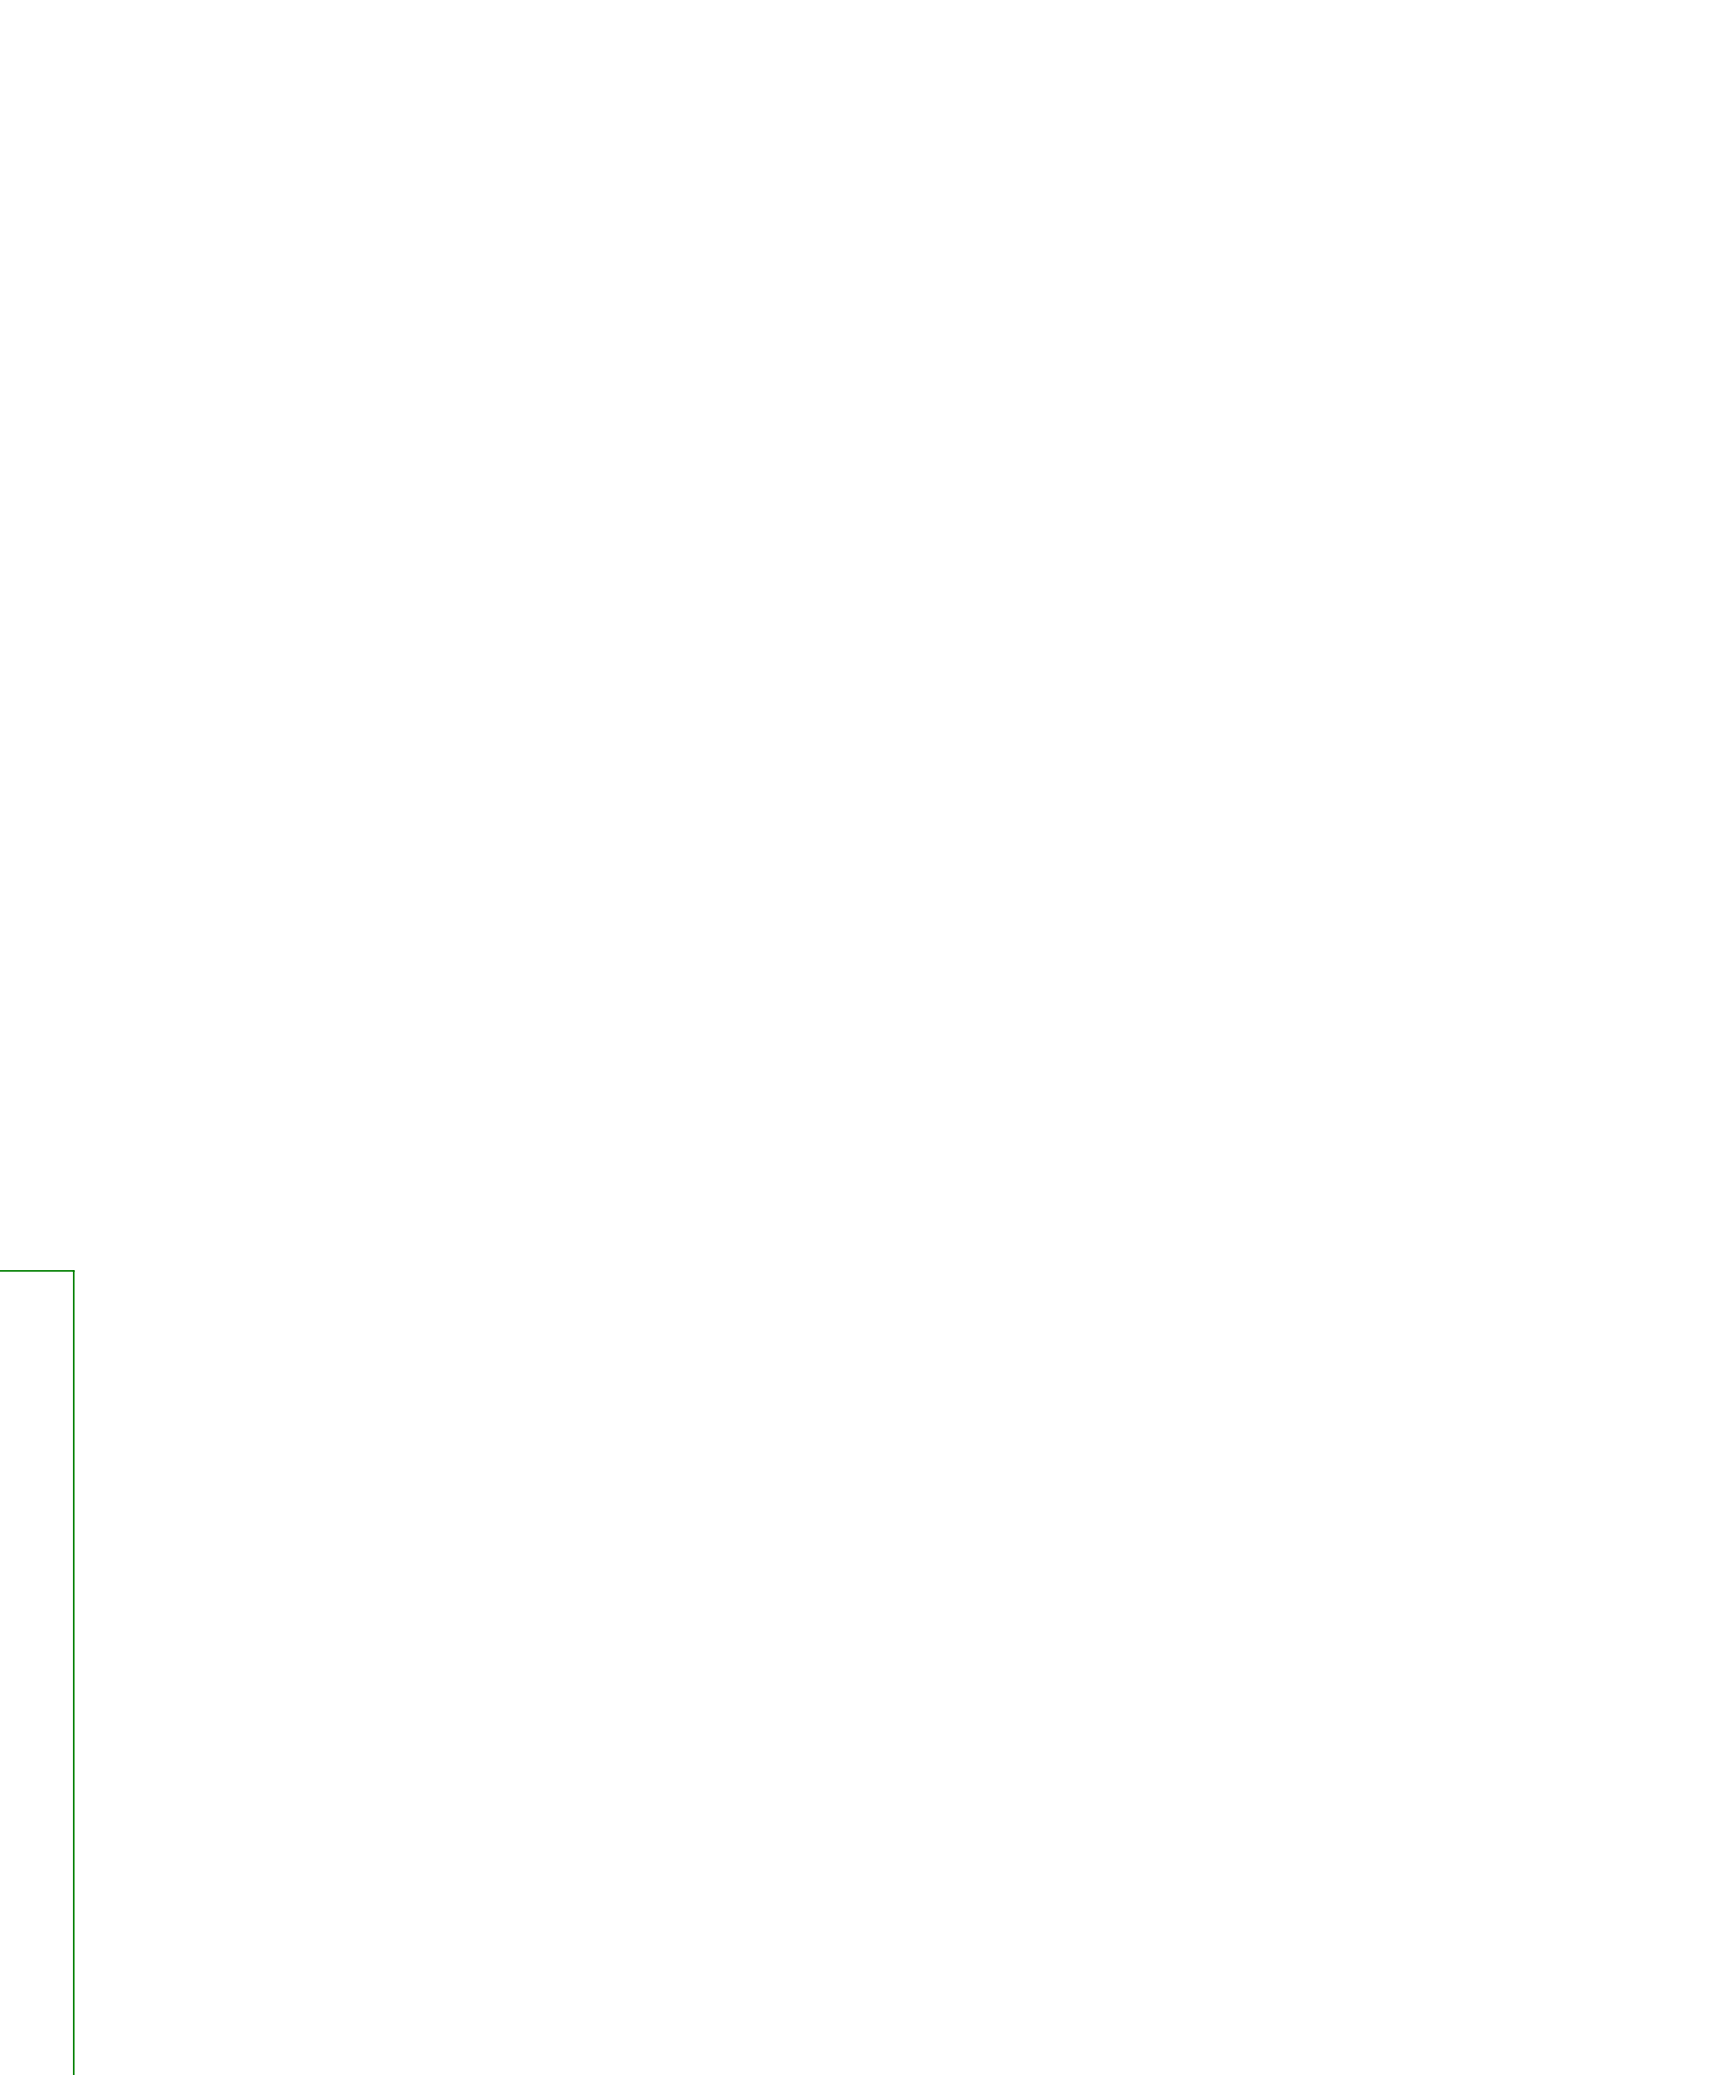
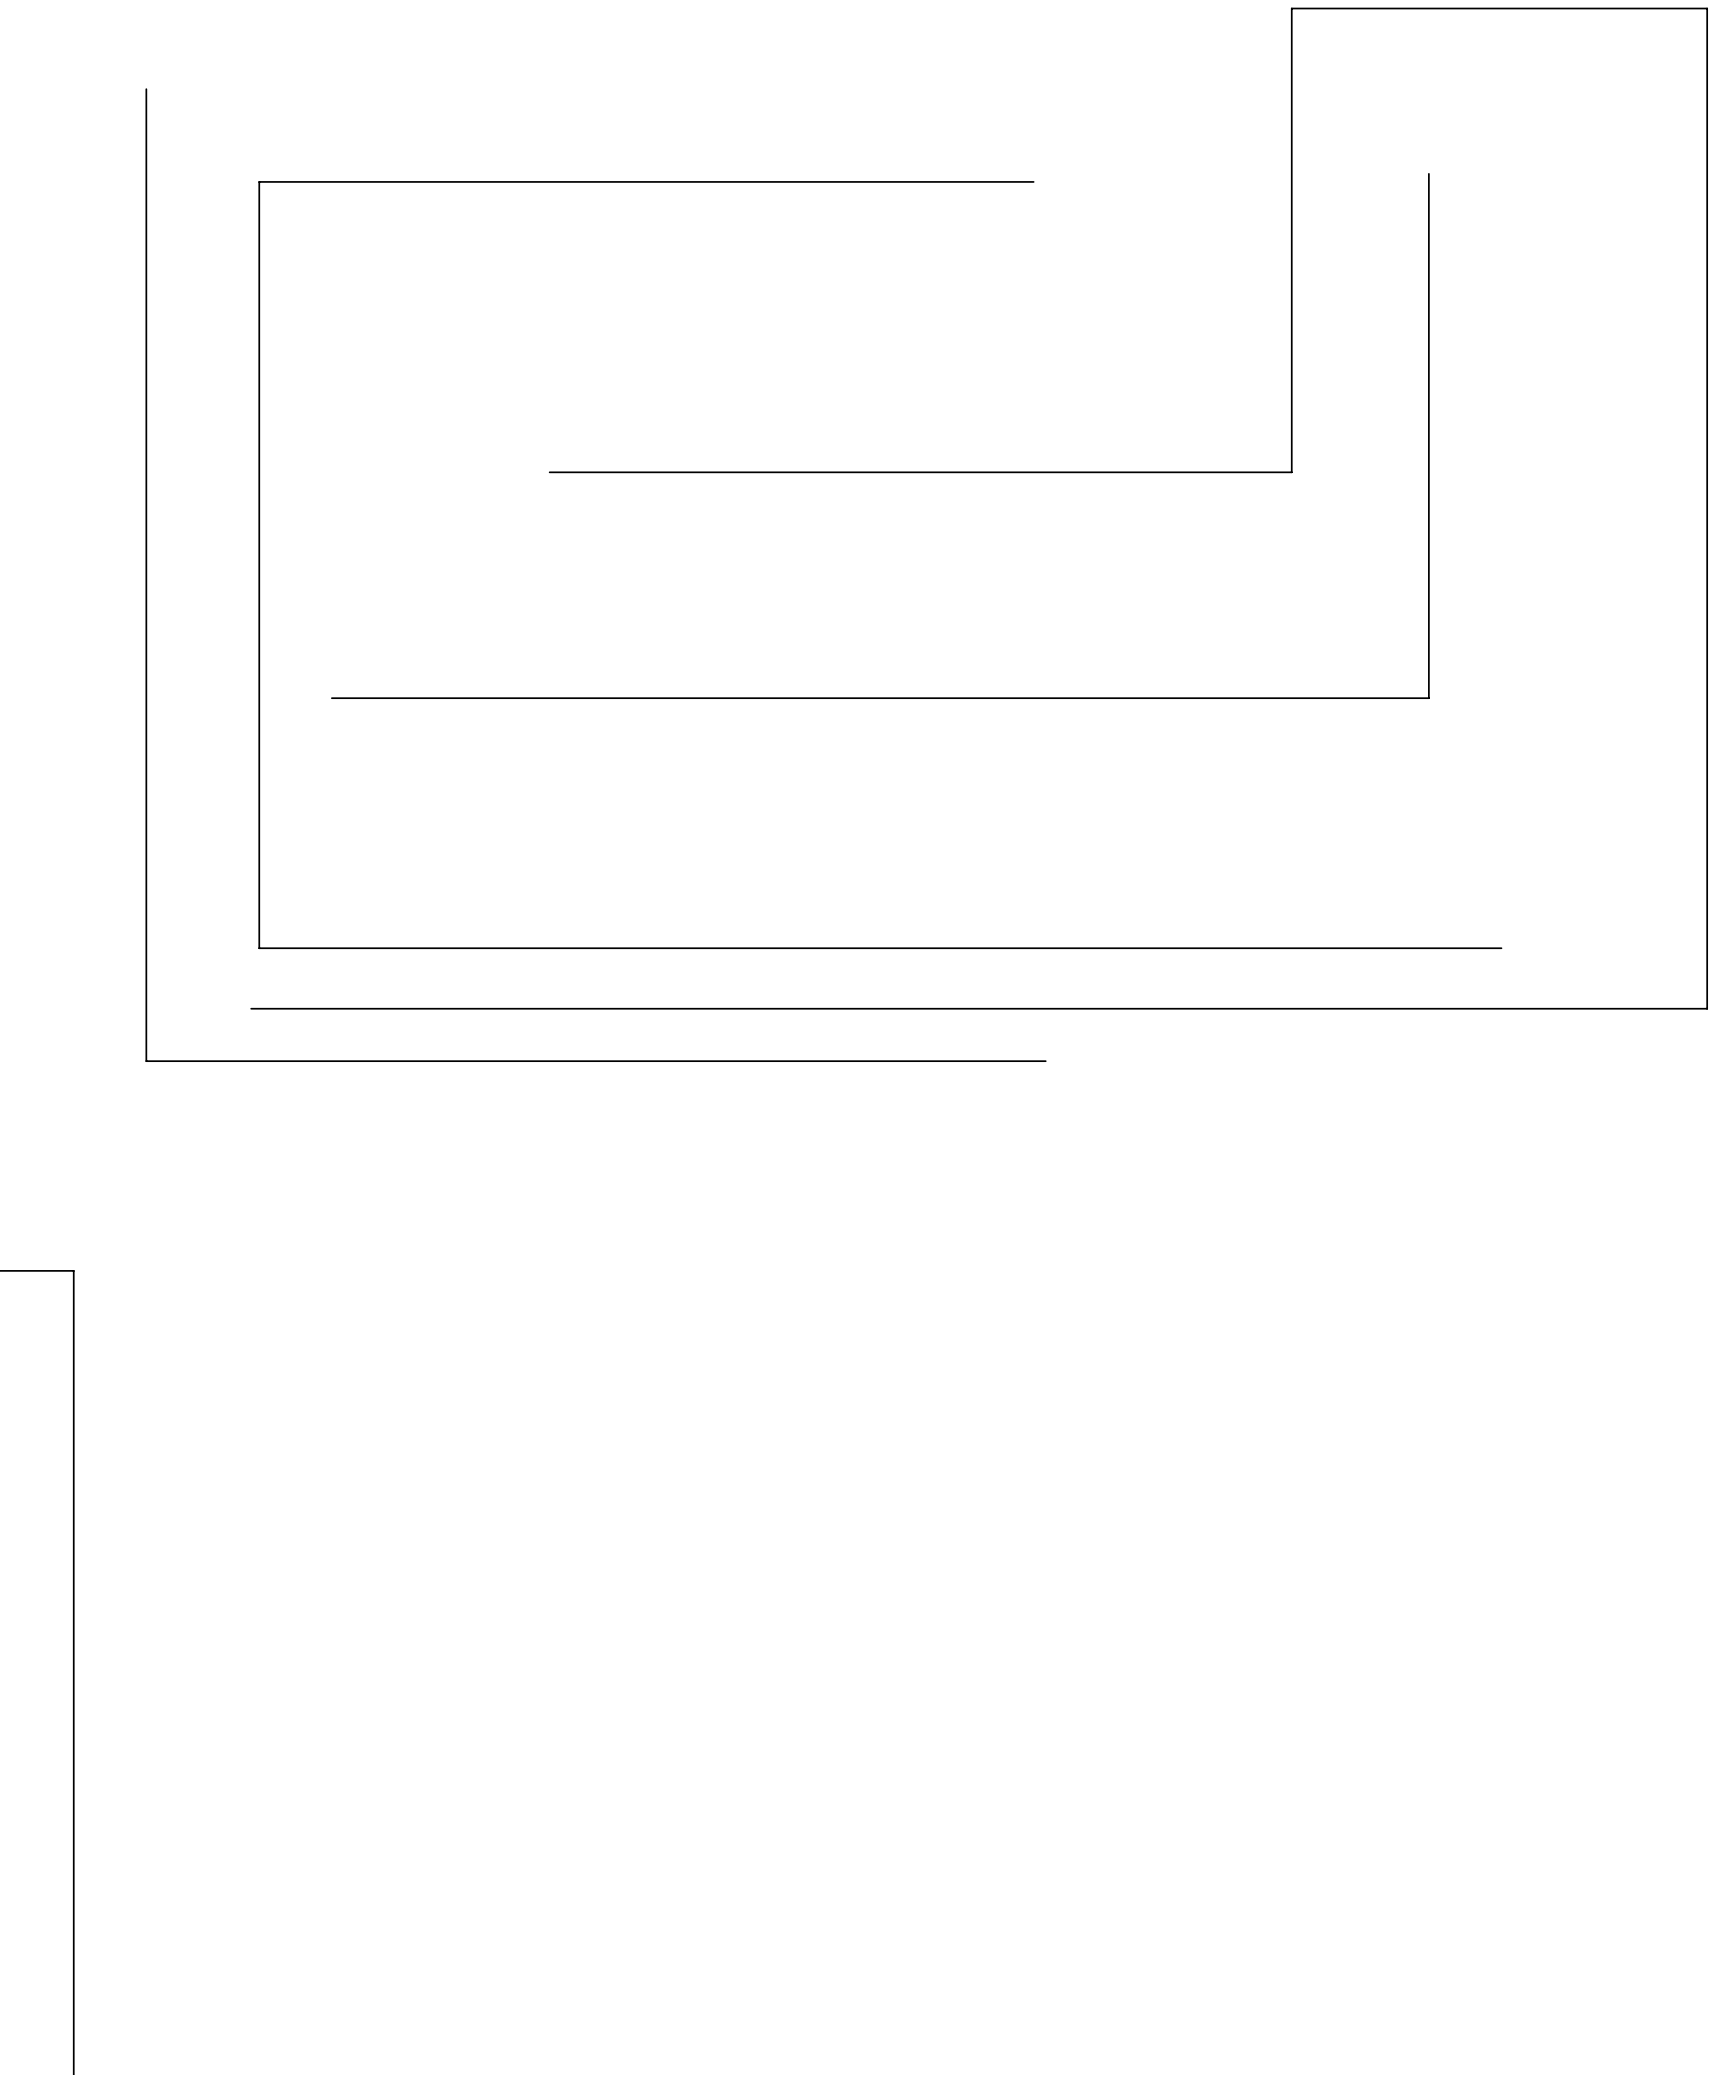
wire: none -> (146, 89) (146, 1061) (1045, 1061)
wire: none -> (1428, 173) (1428, 698) (331, 698)
wire: none -> (1033, 181) (259, 181) (259, 948) (1501, 948)
wire: none -> (549, 472) (1291, 472) (1291, 8) (1707, 8) (1707, 1008) (251, 1008)

